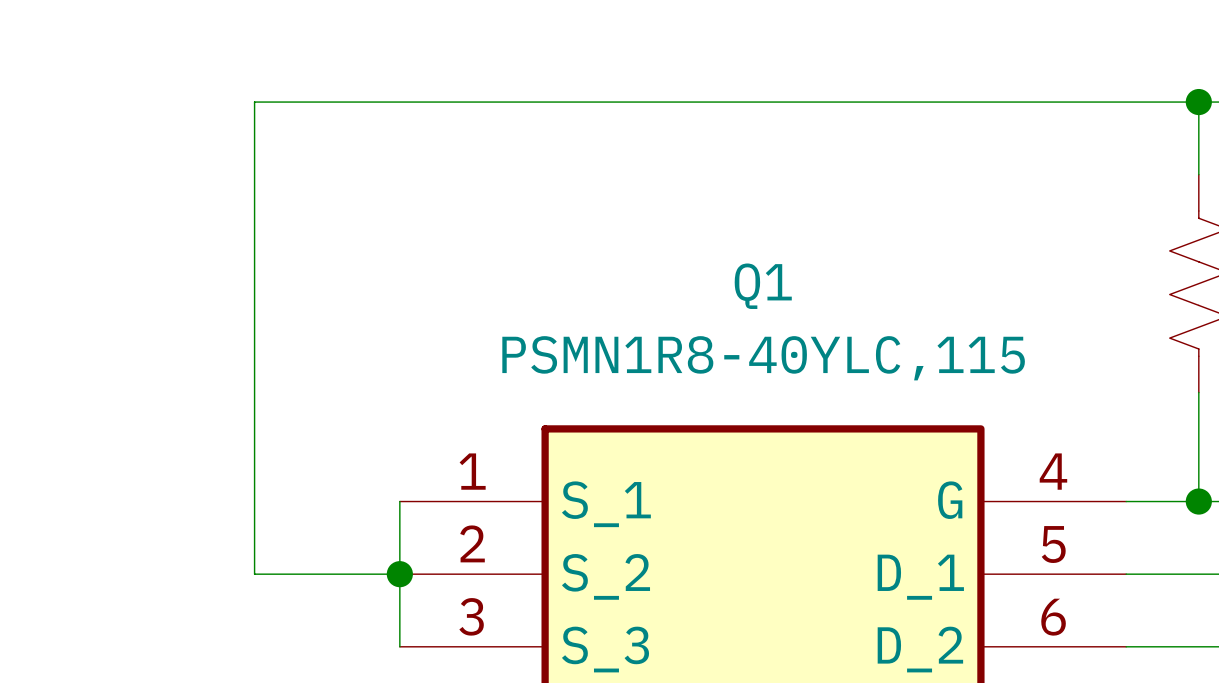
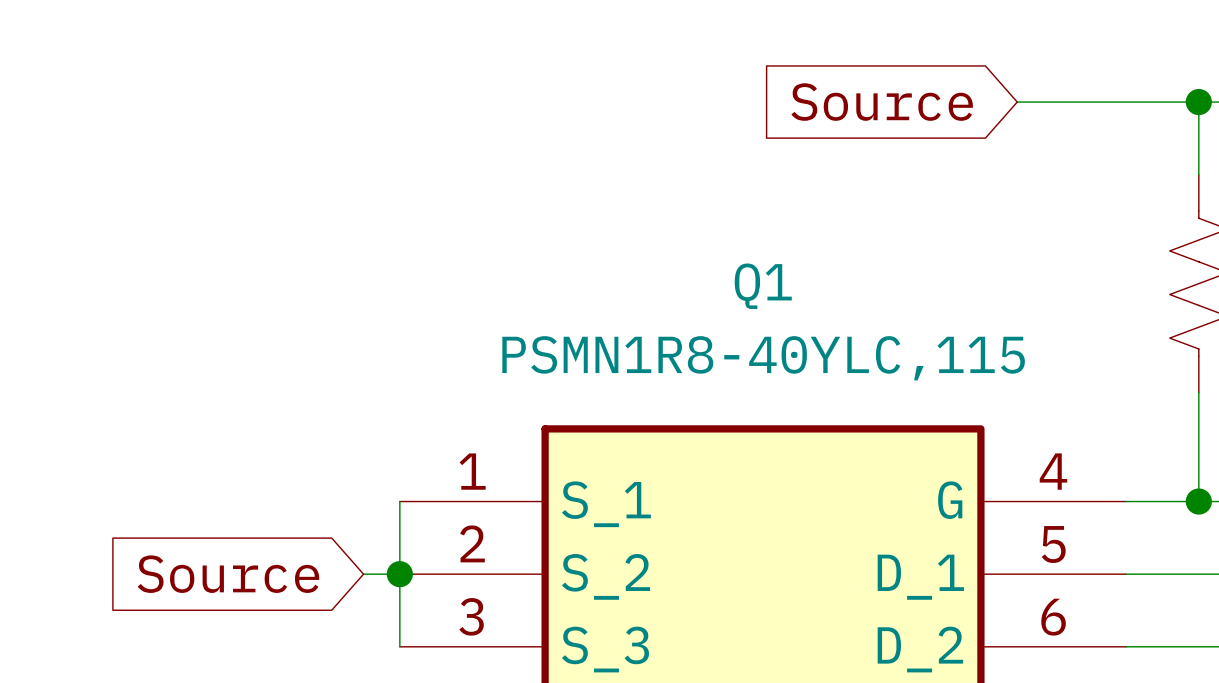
global label: none -> Source (882, 102)
wire: (1017, 102) (254, 102) (254, 574) (363, 574) -> none
global label: none -> Source (228, 574)

